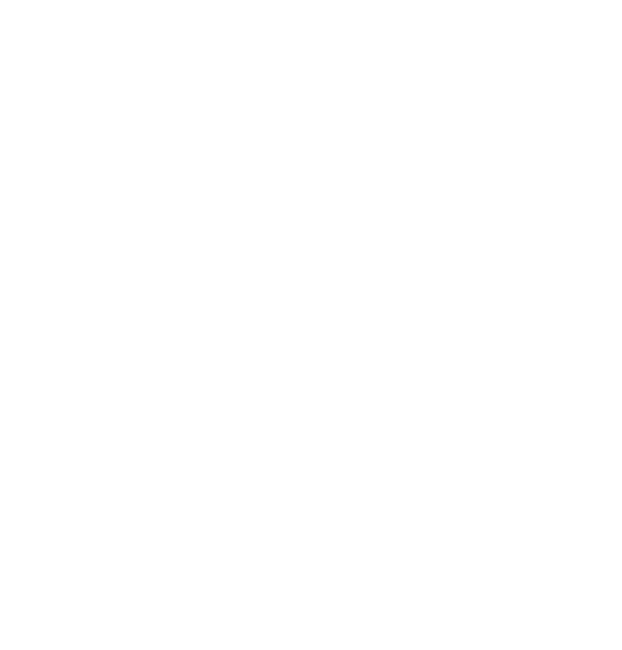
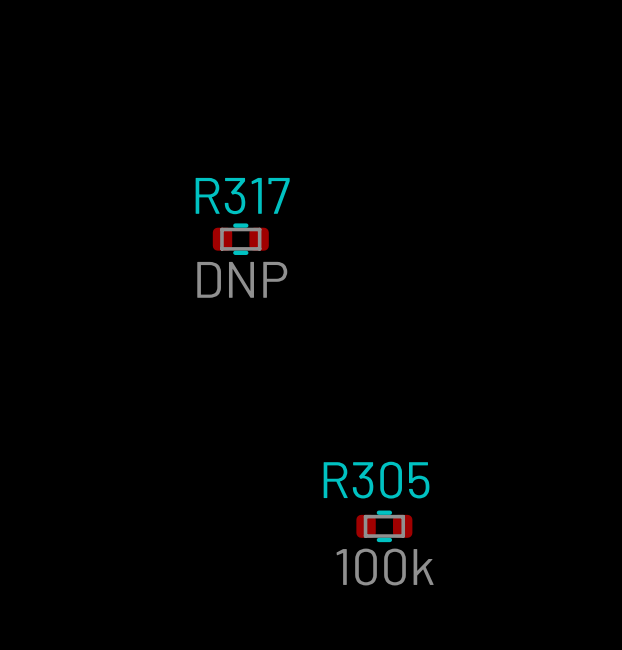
R317: none -> DNP (240, 239)
R305: none -> 100k (384, 526)

